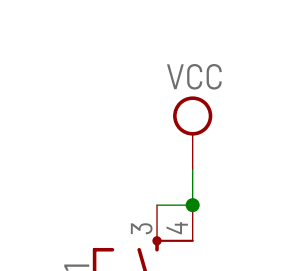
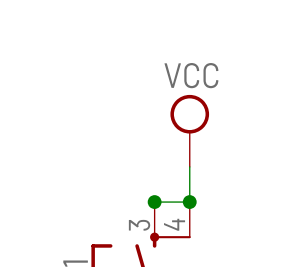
junction: none -> (154, 202)

